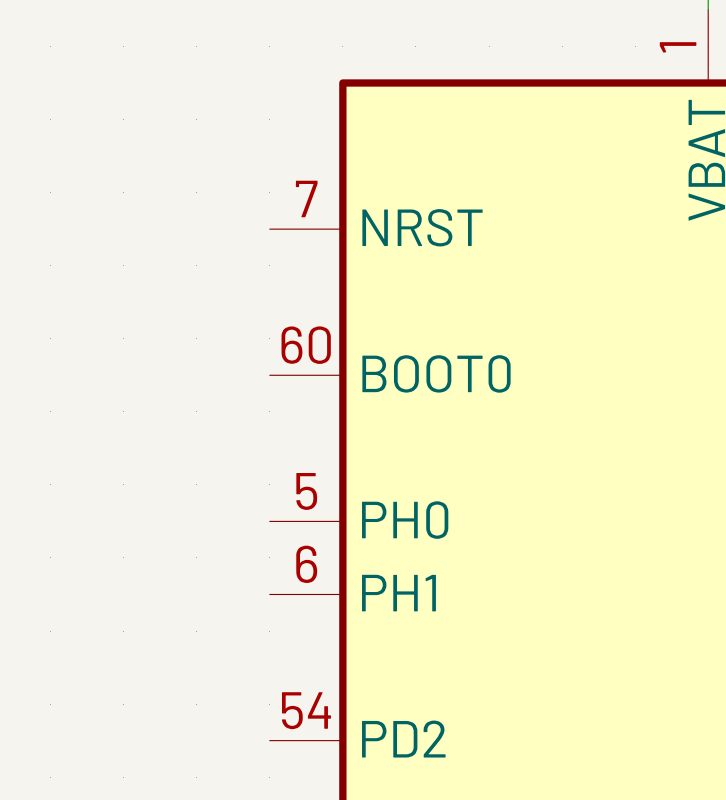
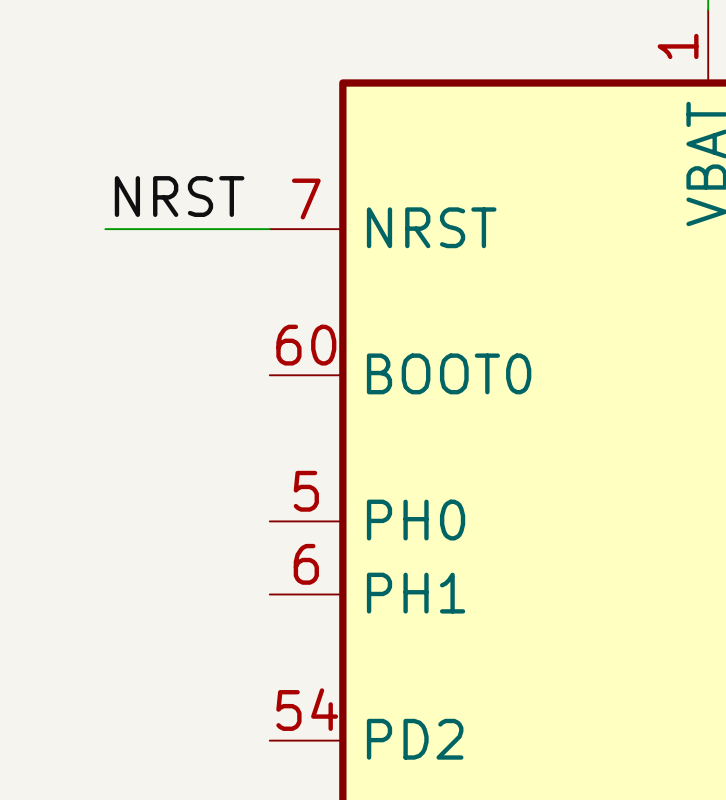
label: none -> NRST (179, 196)
wire: none -> (105, 229) (269, 229)

